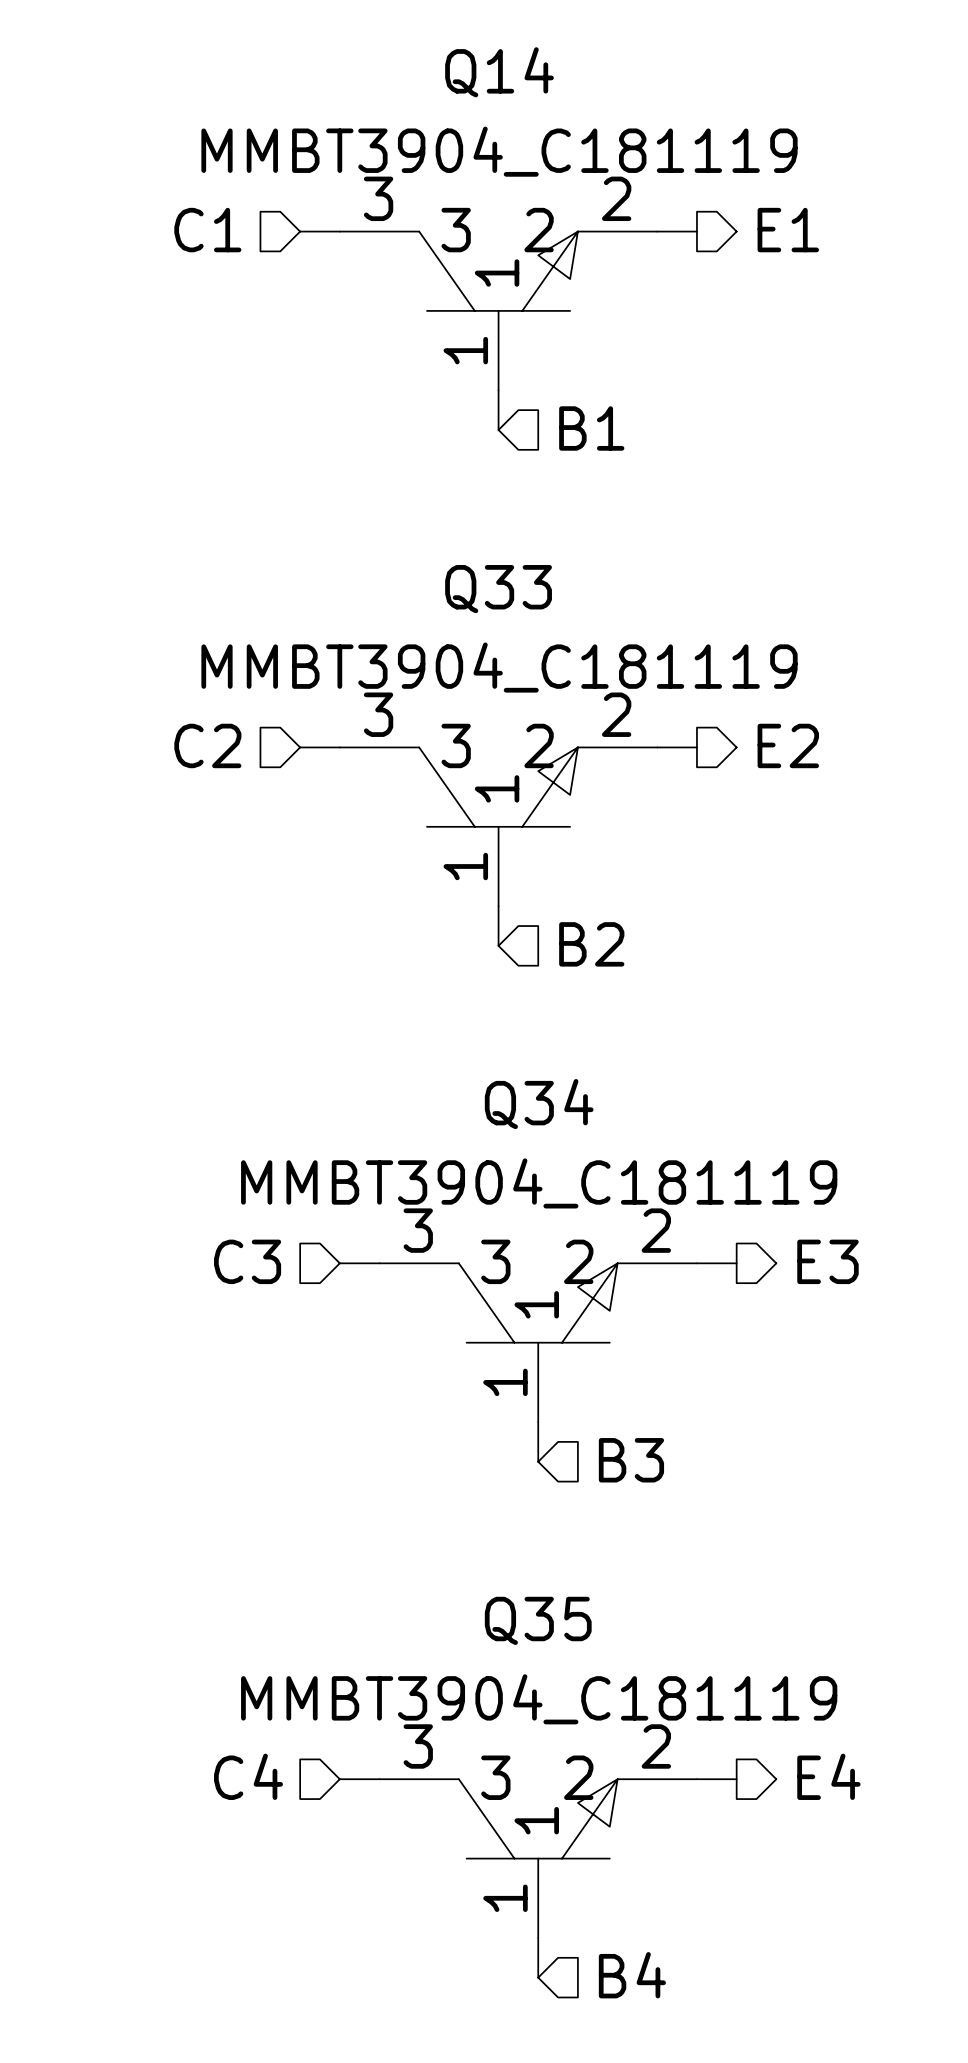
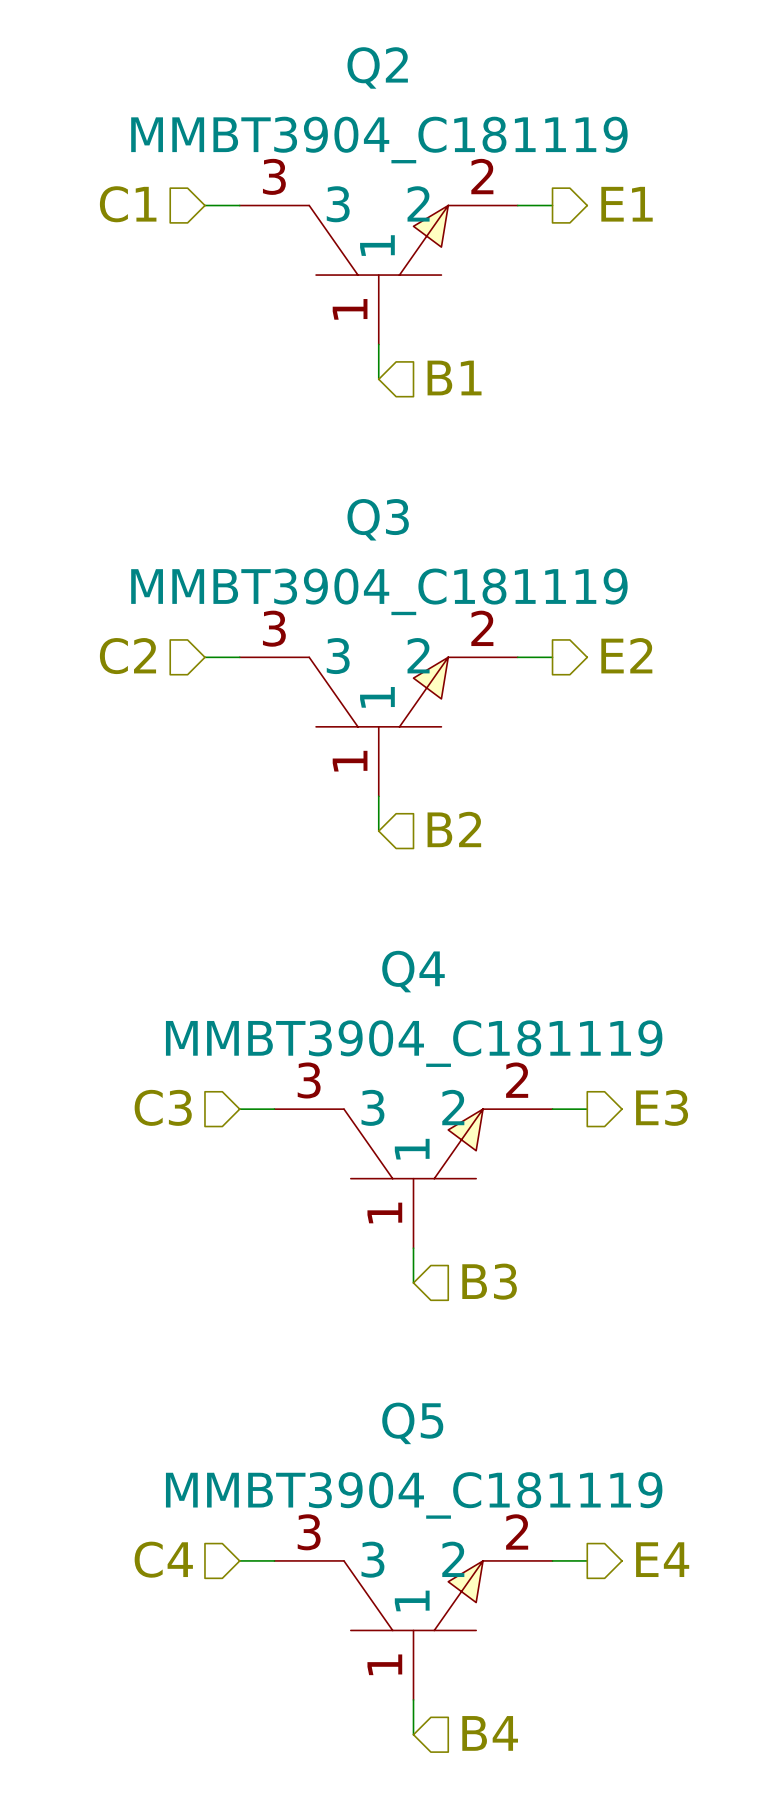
Q14 name: Q14 (499, 72) -> Q2 (377, 67)
Q33 name: Q33 (498, 589) -> Q3 (378, 519)
Q34 name: Q34 (539, 1104) -> Q4 (413, 971)
Q35 name: Q35 (538, 1620) -> Q5 (412, 1423)

